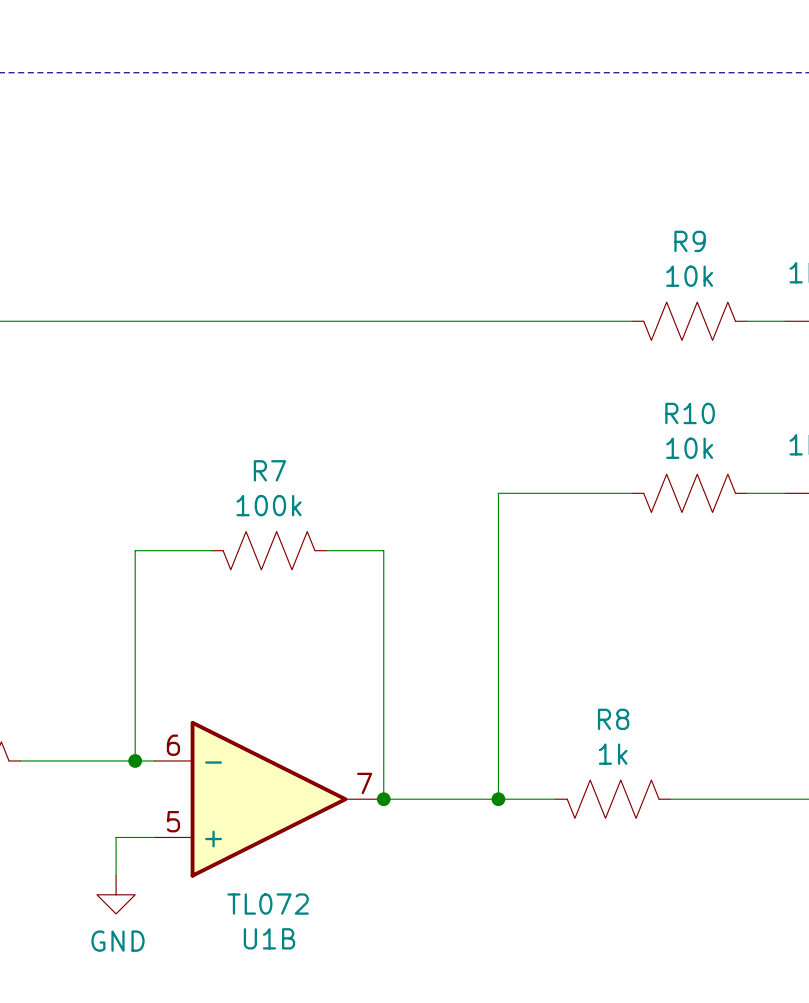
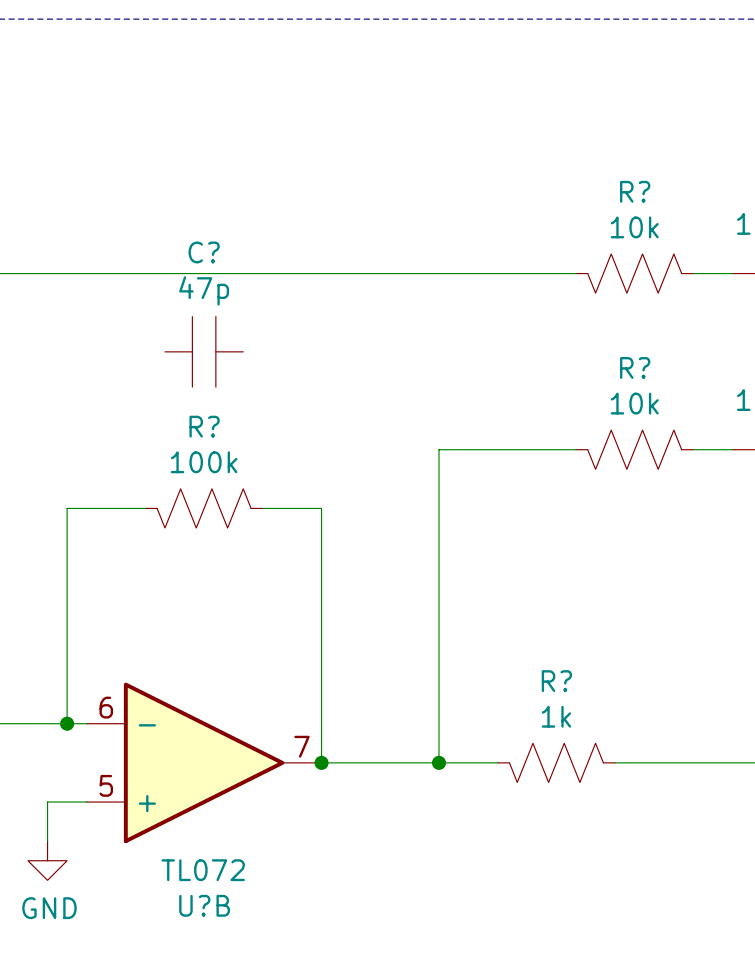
R9 name: R9 (690, 241) -> R? (635, 191)
C?: none -> 47p (204, 351)
R10 name: R10 (690, 413) -> R? (635, 367)
R7 name: R7 (269, 470) -> R? (204, 426)
R8 name: R8 (613, 719) -> R? (556, 681)
U1B name: U1B (269, 938) -> U?B (204, 905)

